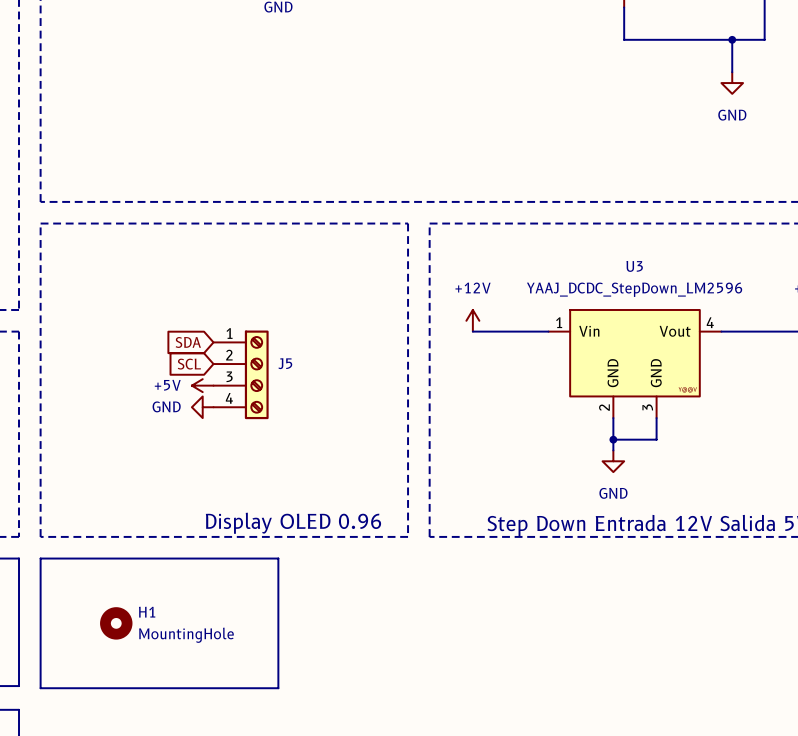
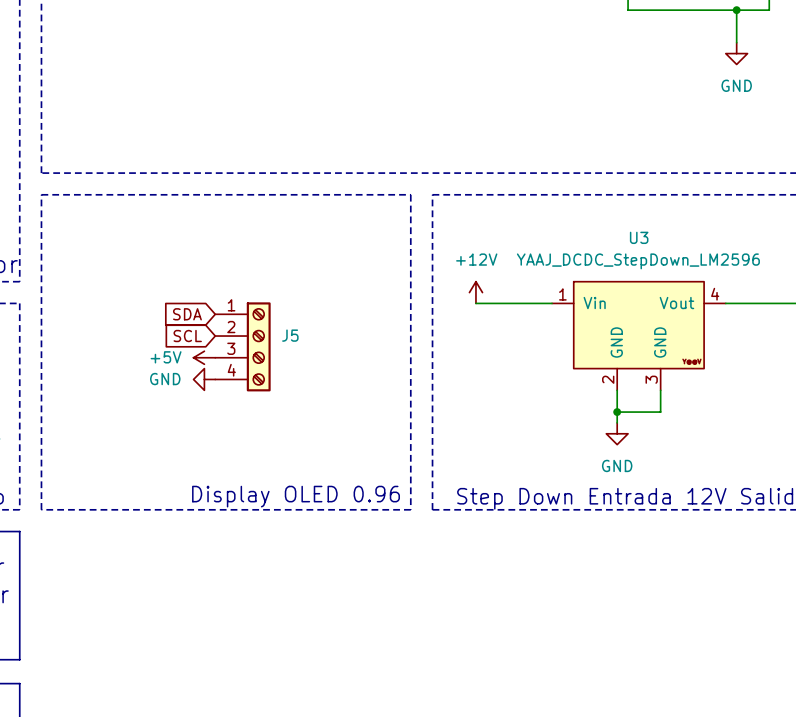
line: (40, 558) (278, 558) (278, 688) (40, 688) (40, 558) -> none
H1: MountingHole (116, 623) -> none

